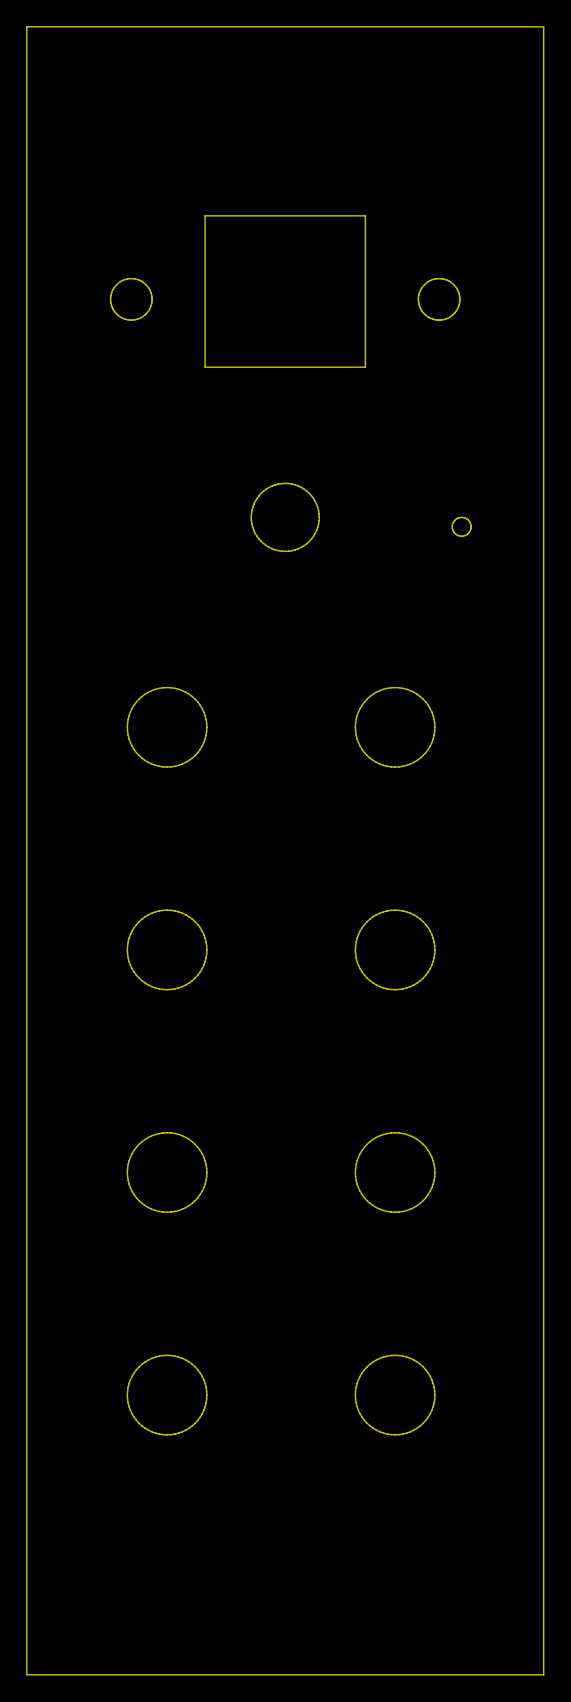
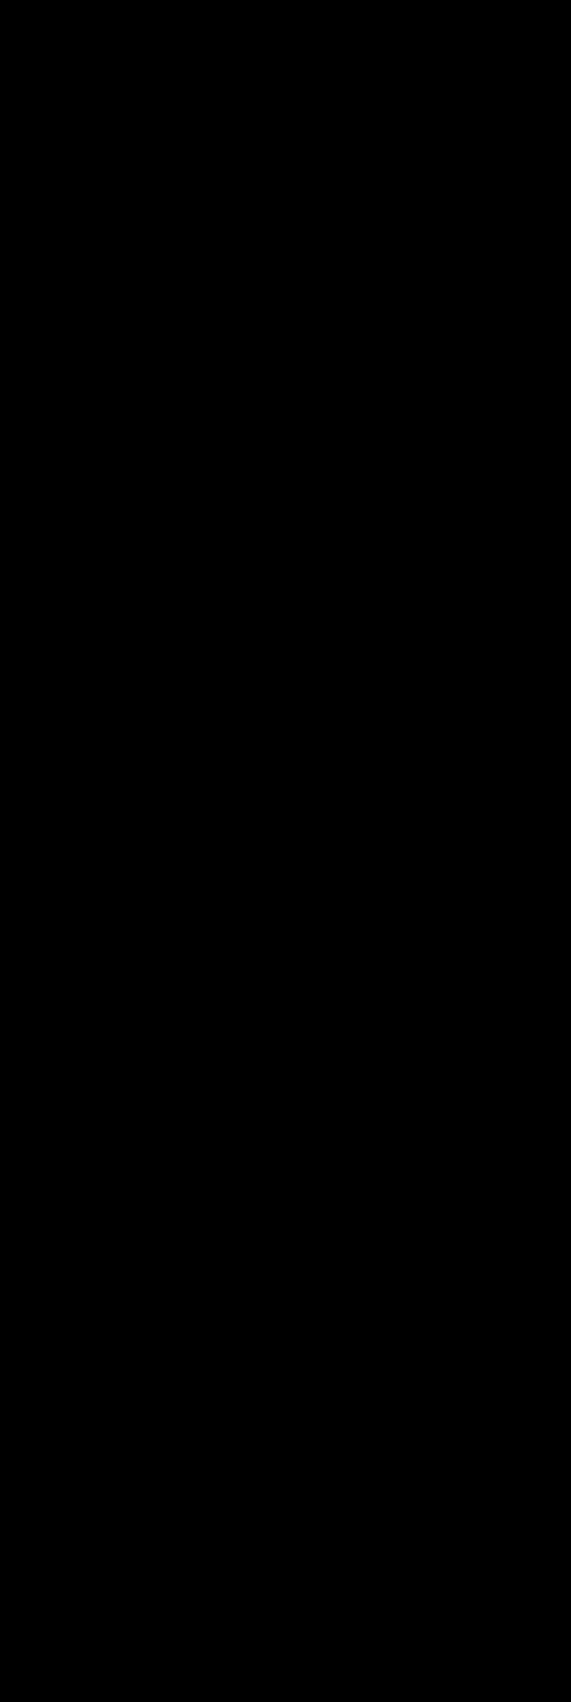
board edge: (543, 26) (26, 26) (26, 1674) (543, 1674) (543, 26) -> none
board edge: (365, 215) (205, 215) (205, 367) (365, 367) (365, 215) -> none
board edge: (131, 278) (139, 280) (146, 284) (150, 291) (152, 299) (150, 307) (146, 314) (139, 318) (131, 320) (123, 318) (116, 314) (112, 307) (110, 299) (112, 291) (116, 284) (123, 280) (131, 278) -> none
board edge: (439, 278) (447, 280) (453, 284) (458, 291) (459, 299) (458, 307) (453, 314) (447, 318) (439, 320) (431, 318) (424, 314) (419, 307) (418, 299) (420, 291) (424, 284) (431, 280) (439, 278) -> none
board edge: (285, 483) (298, 486) (309, 493) (316, 504) (319, 517) (316, 530) (309, 541) (298, 548) (285, 551) (272, 548) (261, 541) (253, 530) (251, 517) (253, 504) (261, 493) (272, 486) (285, 483) -> none
board edge: (461, 517) (468, 520) (471, 526) (468, 533) (461, 536) (455, 533) (452, 526) (455, 520) (461, 517) -> none
board edge: (167, 687) (182, 690) (195, 699) (203, 712) (206, 727) (203, 742) (195, 755) (182, 763) (167, 767) (151, 763) (139, 755) (130, 742) (127, 727) (130, 711) (139, 699) (151, 690) (167, 687) -> none
board edge: (395, 687) (410, 690) (423, 699) (431, 712) (434, 727) (431, 742) (423, 755) (410, 763) (395, 767) (379, 763) (367, 755) (358, 742) (355, 727) (358, 711) (367, 699) (379, 690) (395, 687) -> none
board edge: (167, 910) (182, 913) (195, 921) (203, 934) (206, 949) (203, 965) (195, 978) (182, 986) (167, 989) (151, 986) (139, 978) (130, 965) (127, 949) (130, 934) (139, 921) (151, 913) (167, 910) -> none
board edge: (395, 910) (410, 913) (423, 921) (431, 934) (434, 949) (431, 965) (423, 978) (410, 986) (395, 989) (379, 986) (367, 978) (358, 965) (355, 949) (358, 934) (367, 921) (379, 913) (395, 910) -> none
board edge: (167, 1132) (182, 1135) (195, 1144) (203, 1157) (206, 1172) (203, 1187) (195, 1200) (182, 1209) (167, 1212) (151, 1209) (139, 1200) (130, 1187) (127, 1172) (130, 1157) (139, 1144) (151, 1135) (167, 1132) -> none
board edge: (395, 1132) (410, 1135) (423, 1144) (431, 1157) (434, 1172) (431, 1187) (423, 1200) (410, 1209) (395, 1212) (379, 1209) (367, 1200) (358, 1187) (355, 1172) (358, 1157) (367, 1144) (379, 1135) (395, 1132) -> none
board edge: (167, 1355) (182, 1358) (195, 1366) (203, 1379) (206, 1395) (203, 1410) (195, 1423) (182, 1431) (167, 1434) (151, 1431) (139, 1423) (130, 1410) (127, 1395) (130, 1379) (139, 1366) (151, 1358) (167, 1355) -> none
board edge: (395, 1355) (410, 1358) (423, 1366) (431, 1379) (434, 1395) (431, 1410) (423, 1423) (410, 1431) (395, 1434) (379, 1431) (367, 1423) (358, 1410) (355, 1395) (358, 1379) (367, 1366) (379, 1358) (395, 1355) -> none

